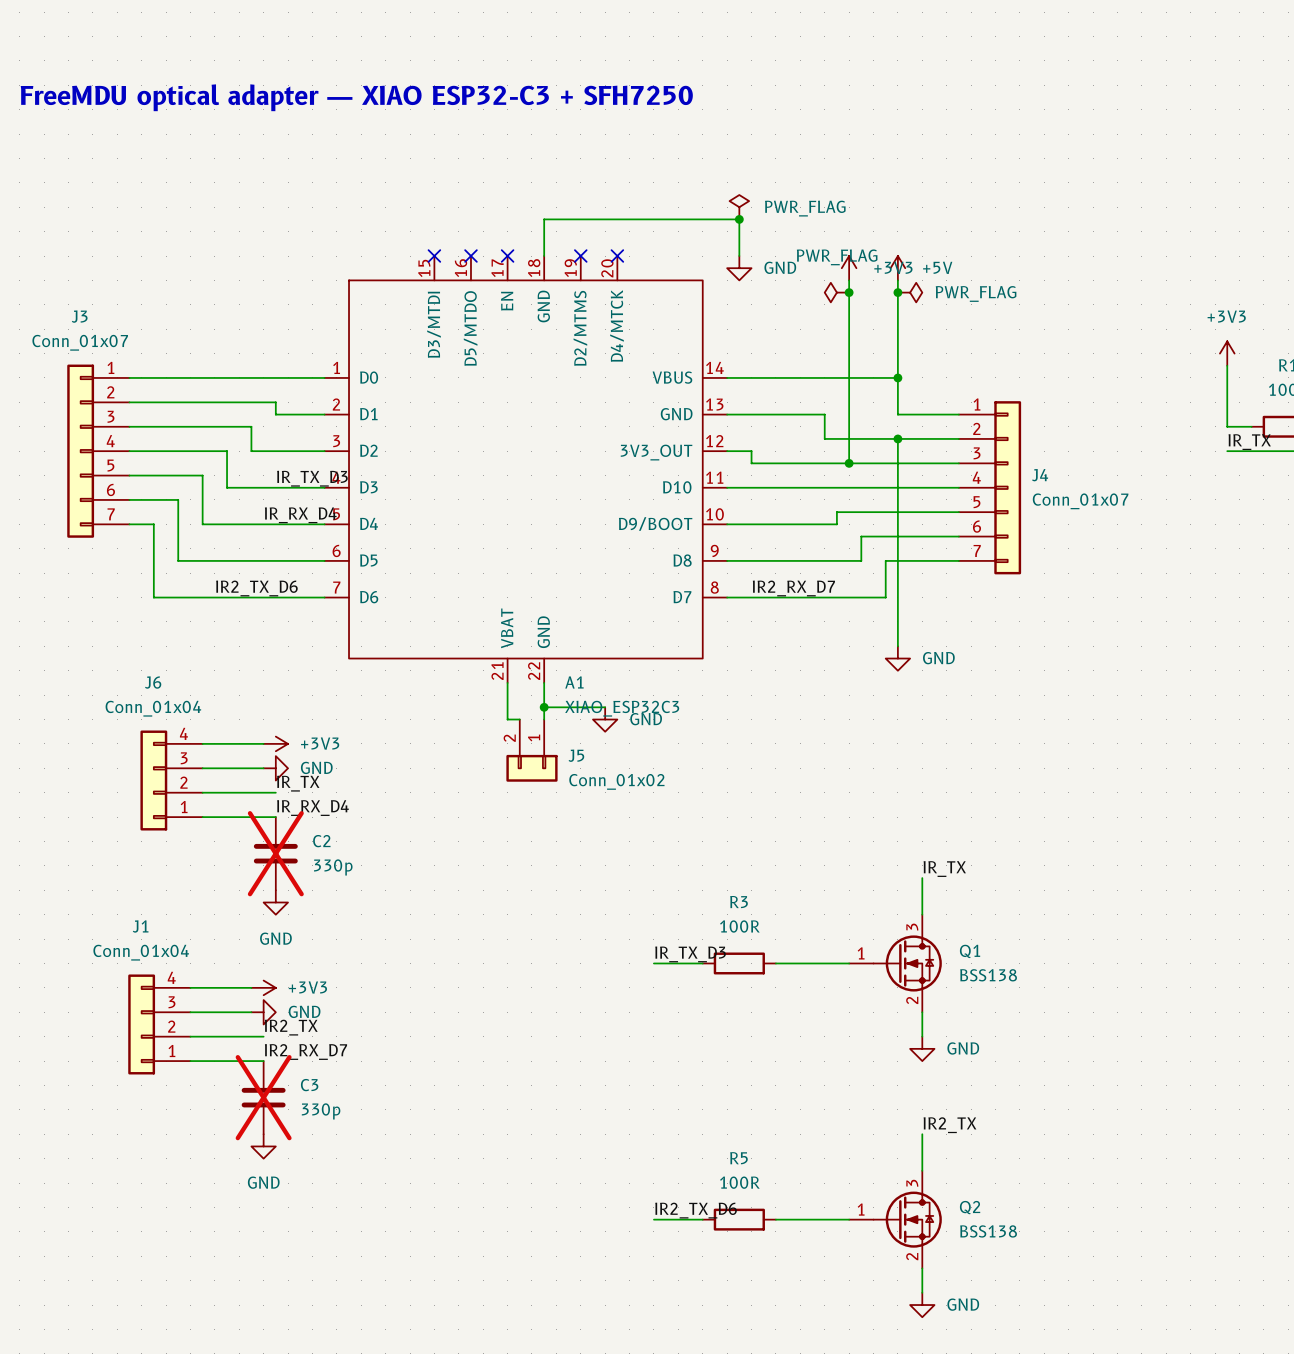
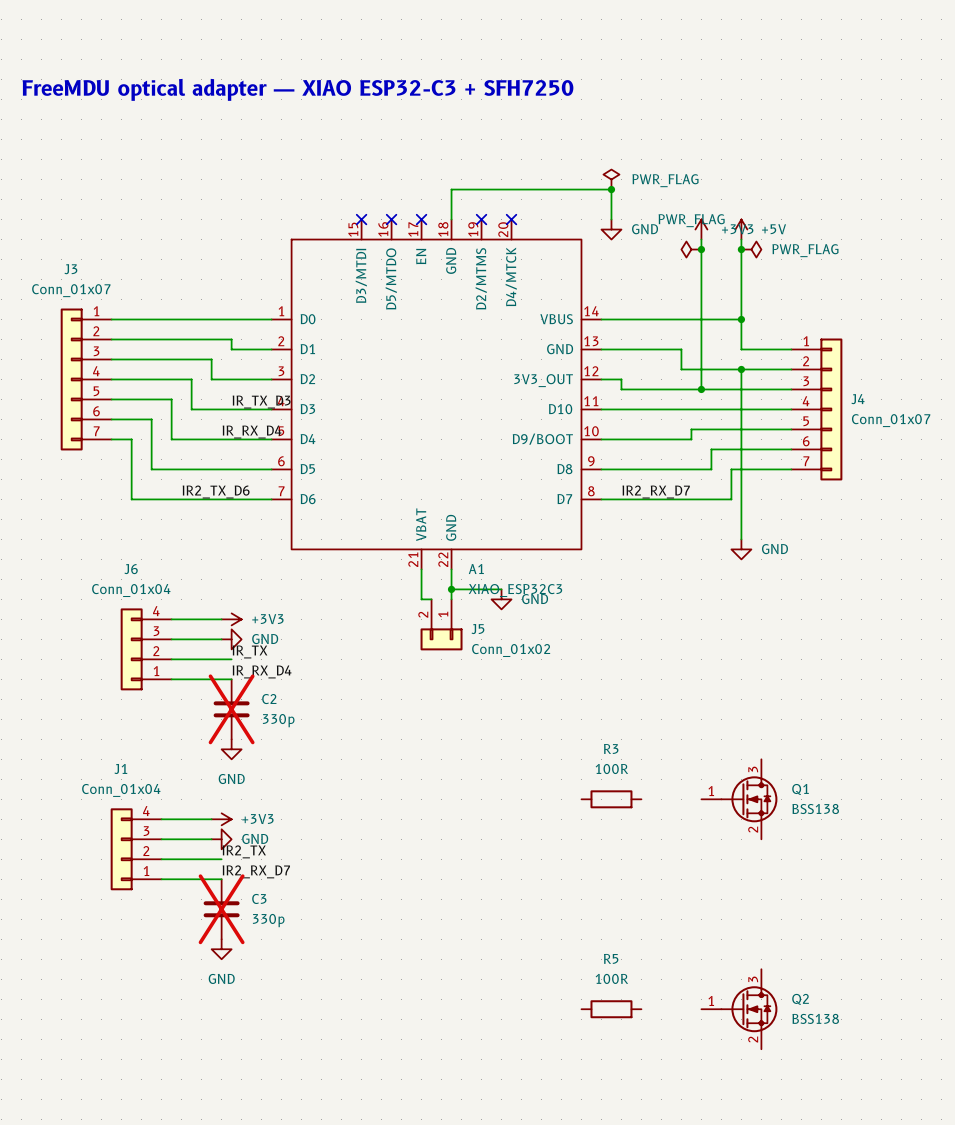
label: IR_TX (944, 869) -> none
wire: (922, 878) (922, 914) -> none
label: IR_TX_D3 (690, 954) -> none
wire: (653, 963) (702, 963) -> none
wire: (775, 963) (849, 963) -> none
wire: (922, 1012) (922, 1036) -> none
power symbol: GND (922, 1048) -> none
label: IR2_TX (949, 1125) -> none
wire: (922, 1134) (922, 1170) -> none
label: IR2_TX_D6 (696, 1210) -> none
wire: (653, 1219) (702, 1219) -> none
wire: (775, 1219) (849, 1219) -> none
wire: (922, 1268) (922, 1292) -> none
power symbol: GND (922, 1305) -> none

